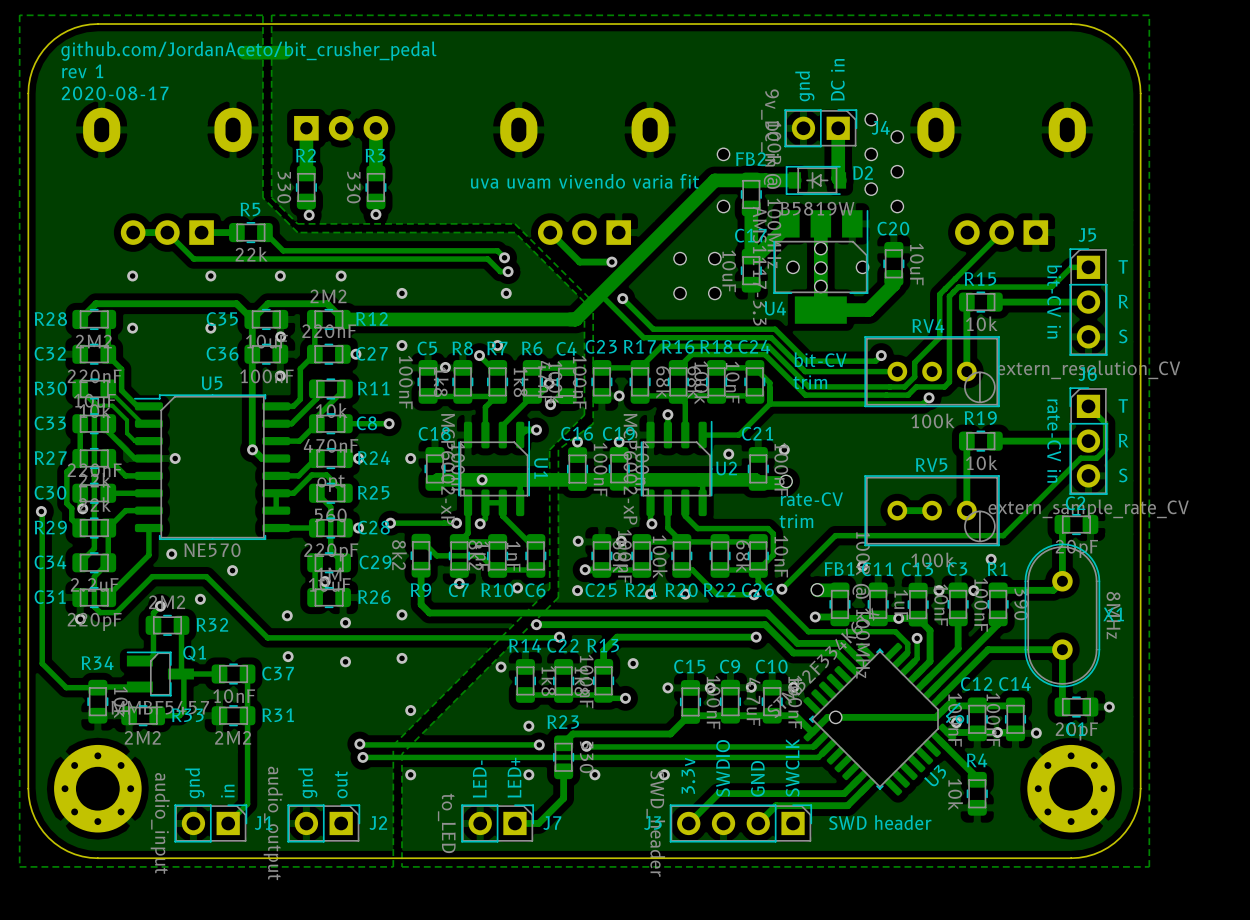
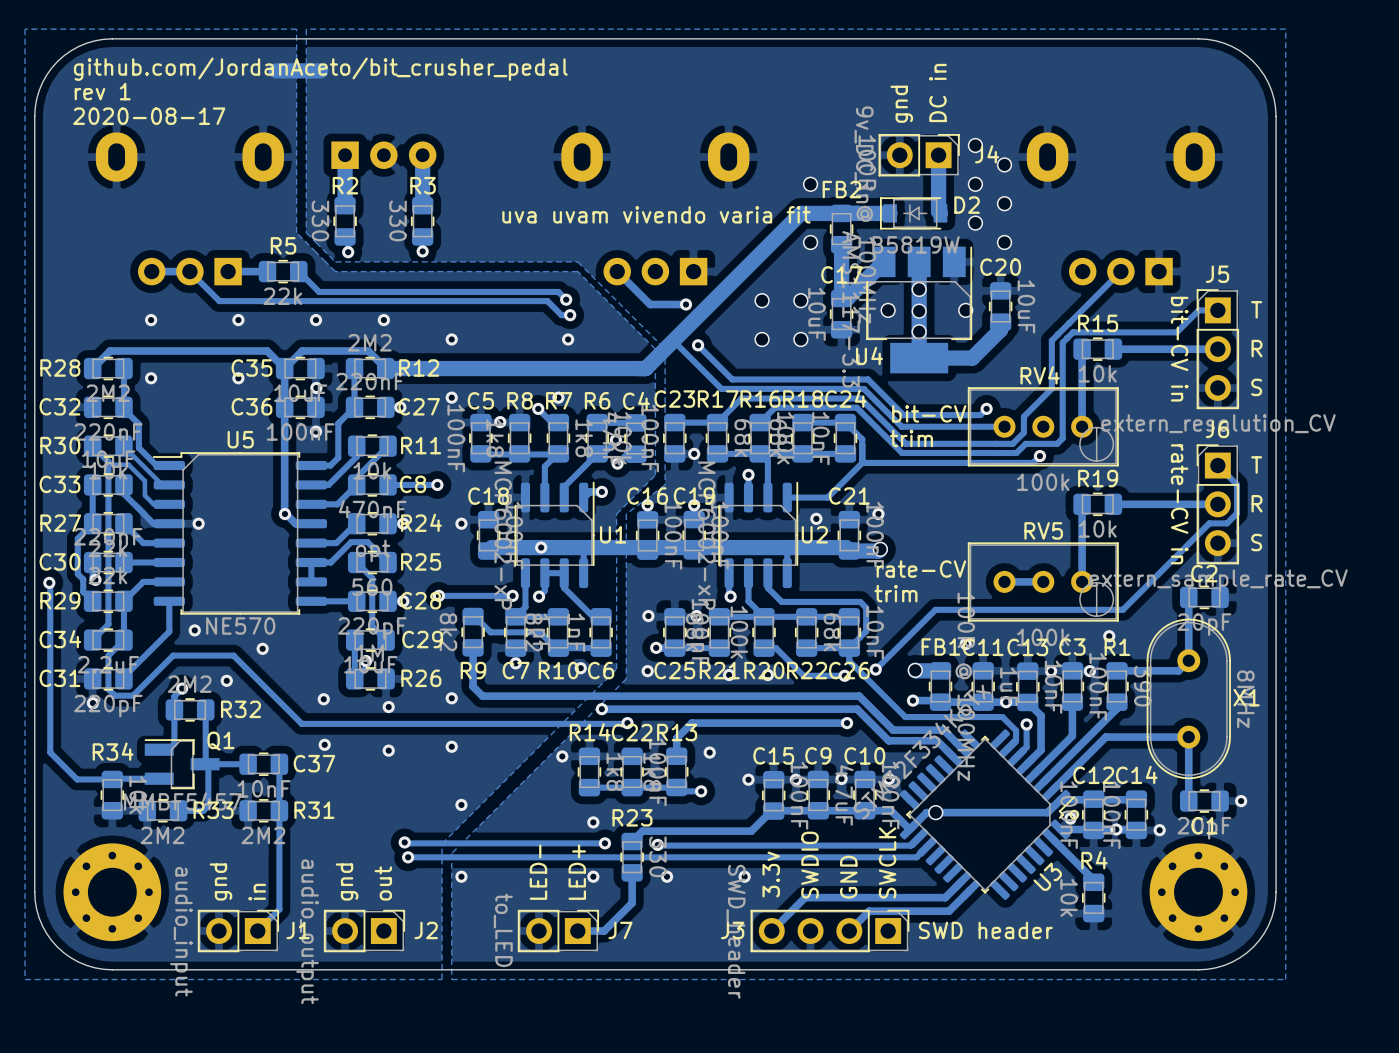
U1 name rotation: 0° (541, 468) -> 90° counterclockwise (613, 534)

